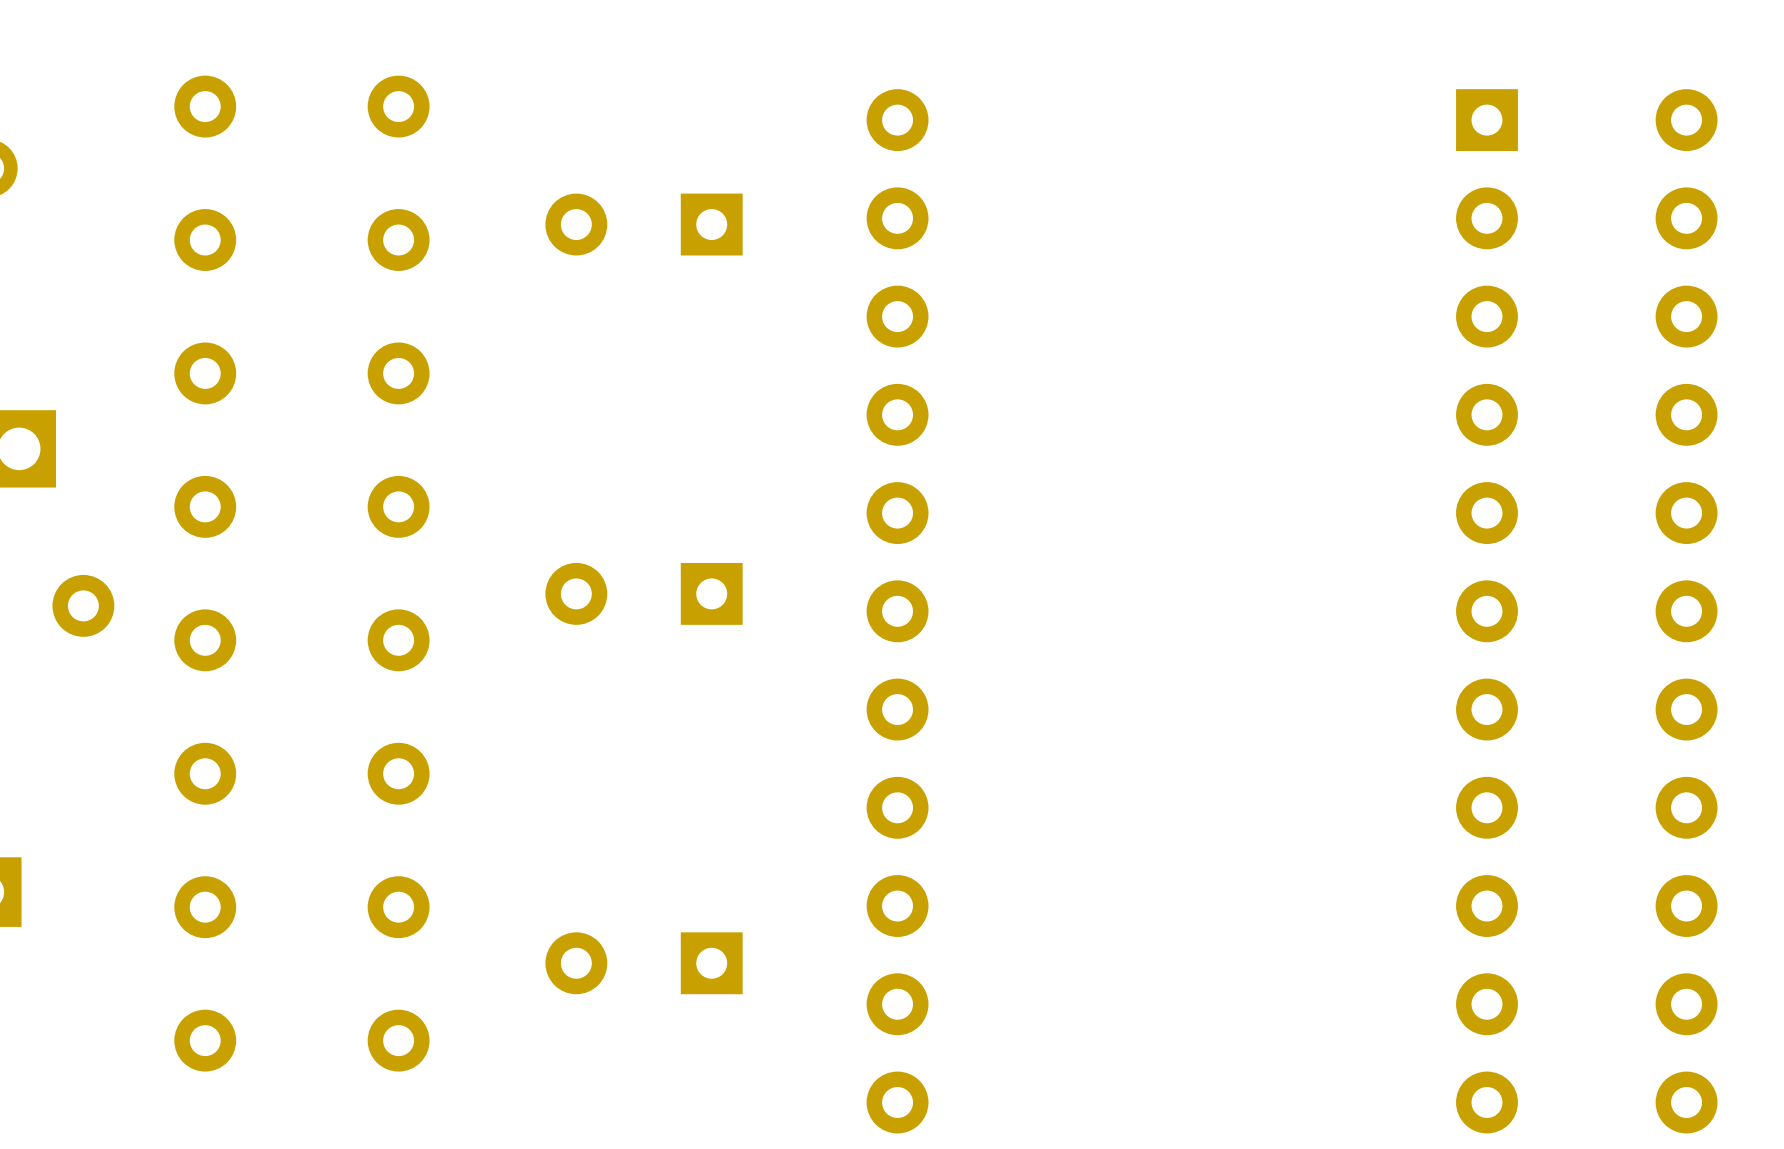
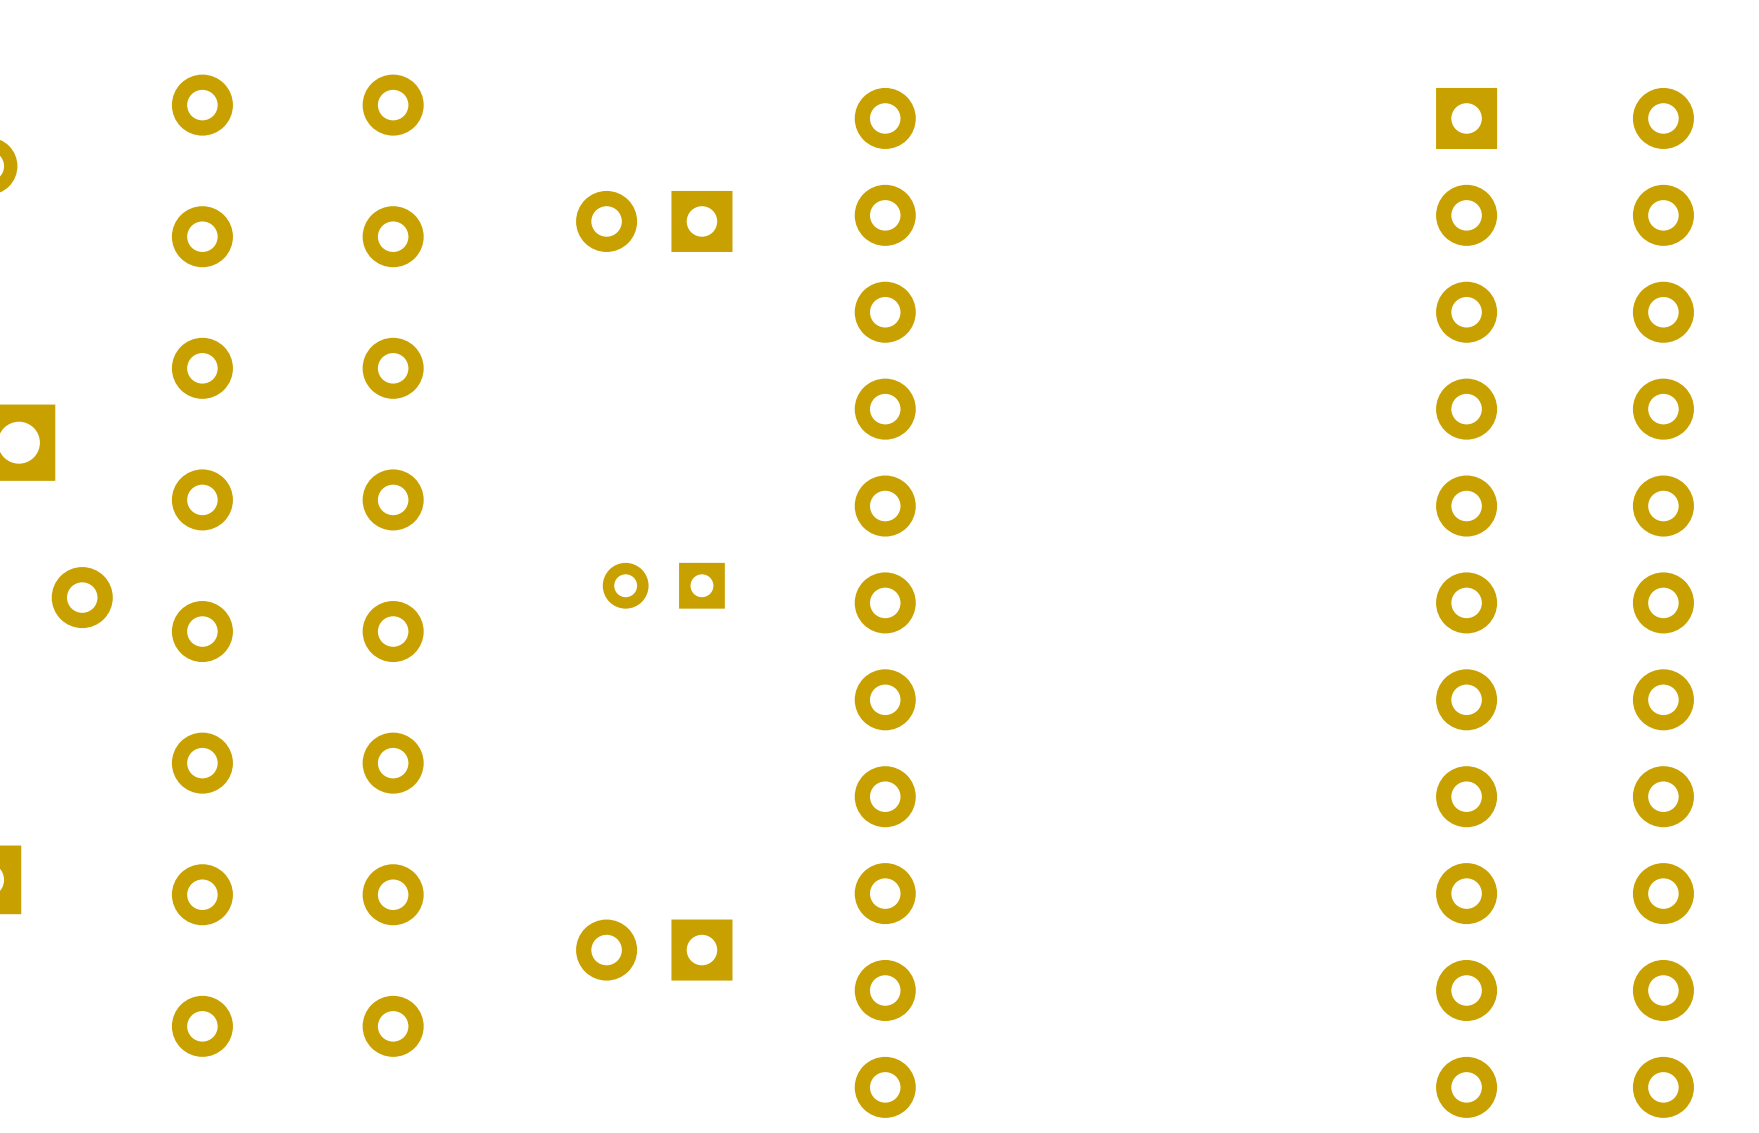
part footprint: [545, 193, 743, 256] -> [576, 190, 733, 252]
part footprint: [545, 562, 743, 625] -> [602, 562, 725, 609]
part footprint: [545, 932, 743, 995] -> [576, 919, 733, 981]

